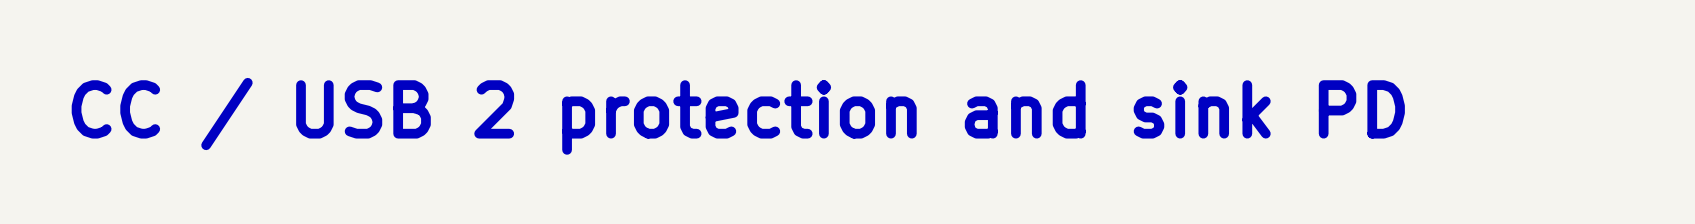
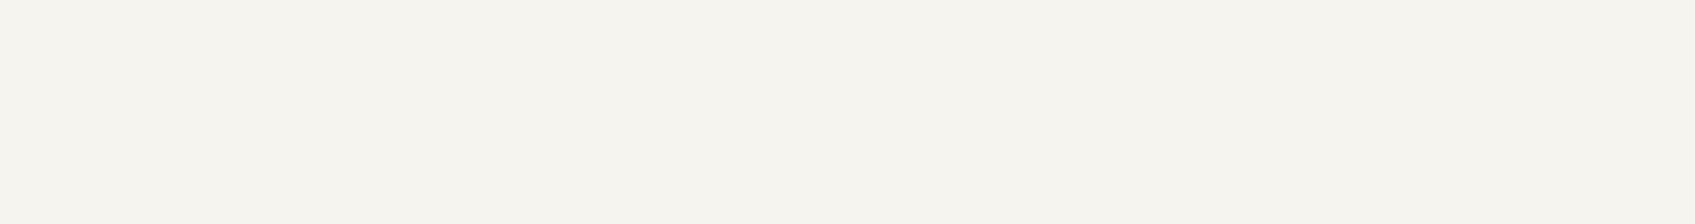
text: CC / USB 2 protection and sink PD (738, 116) -> none

